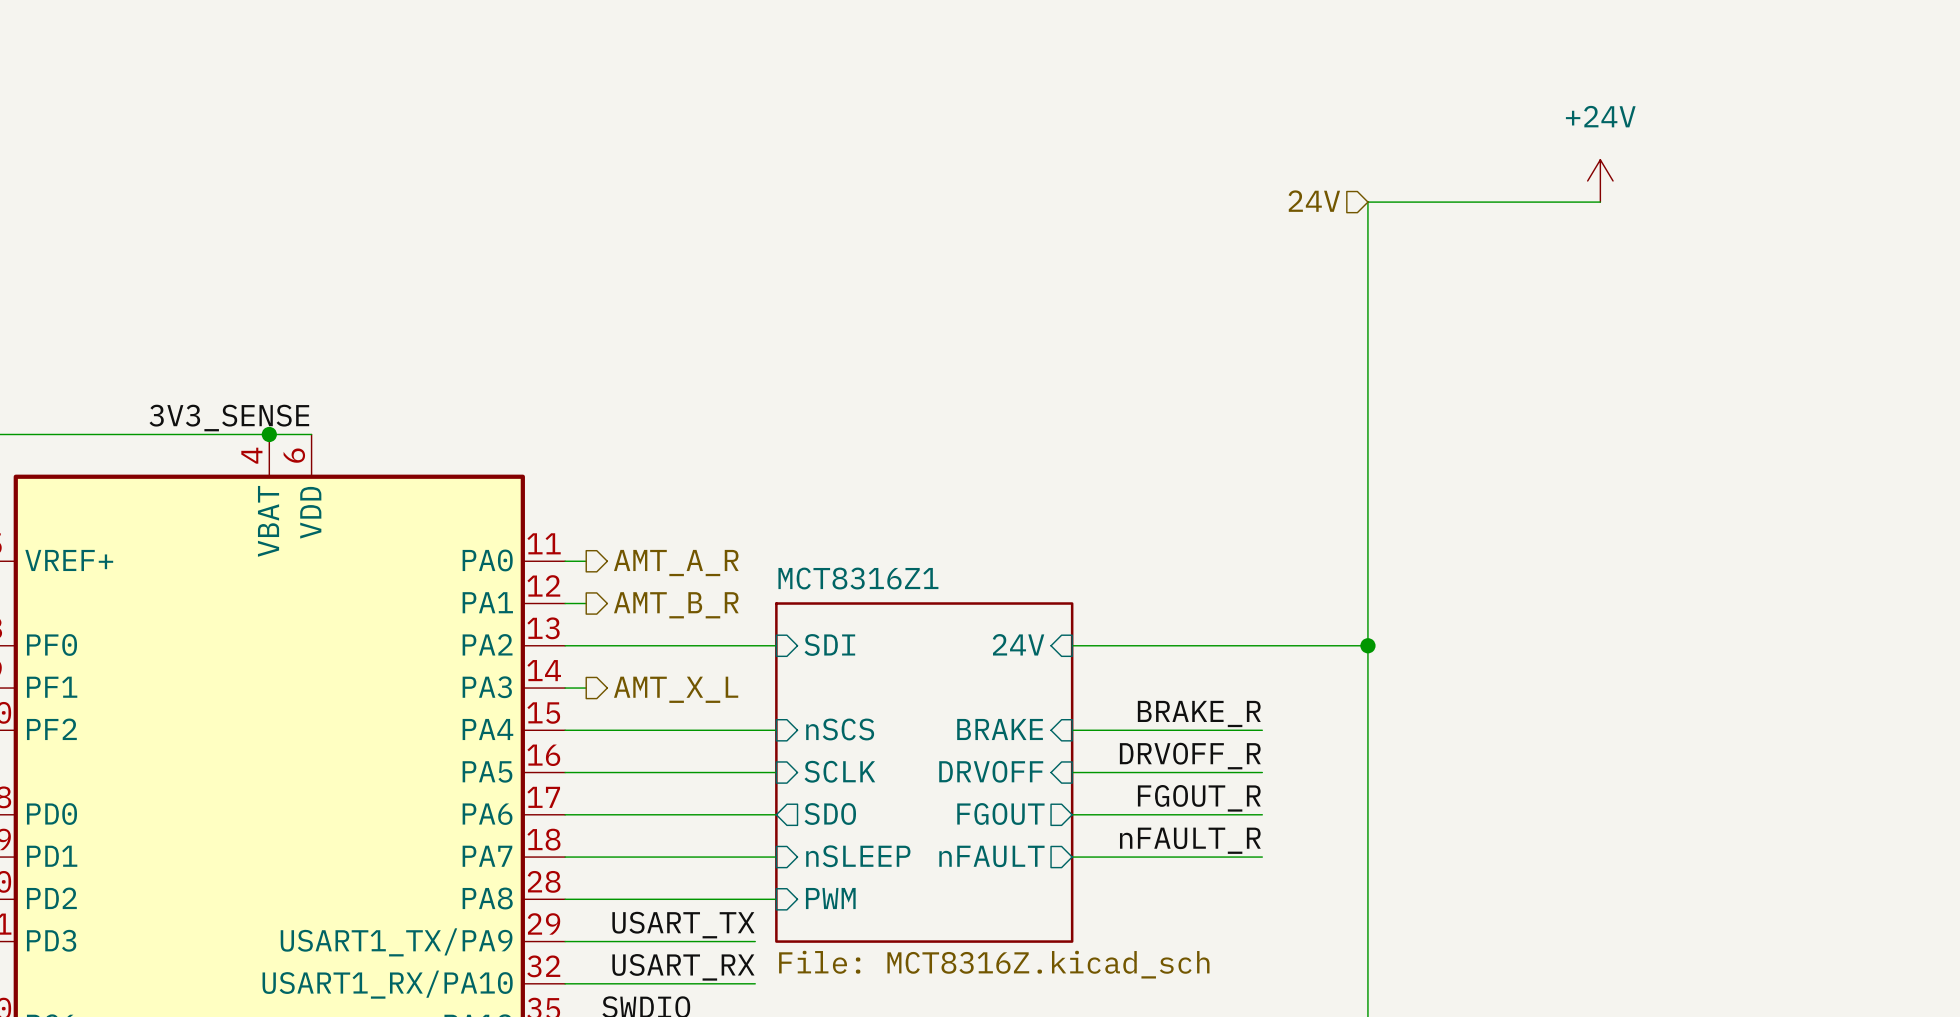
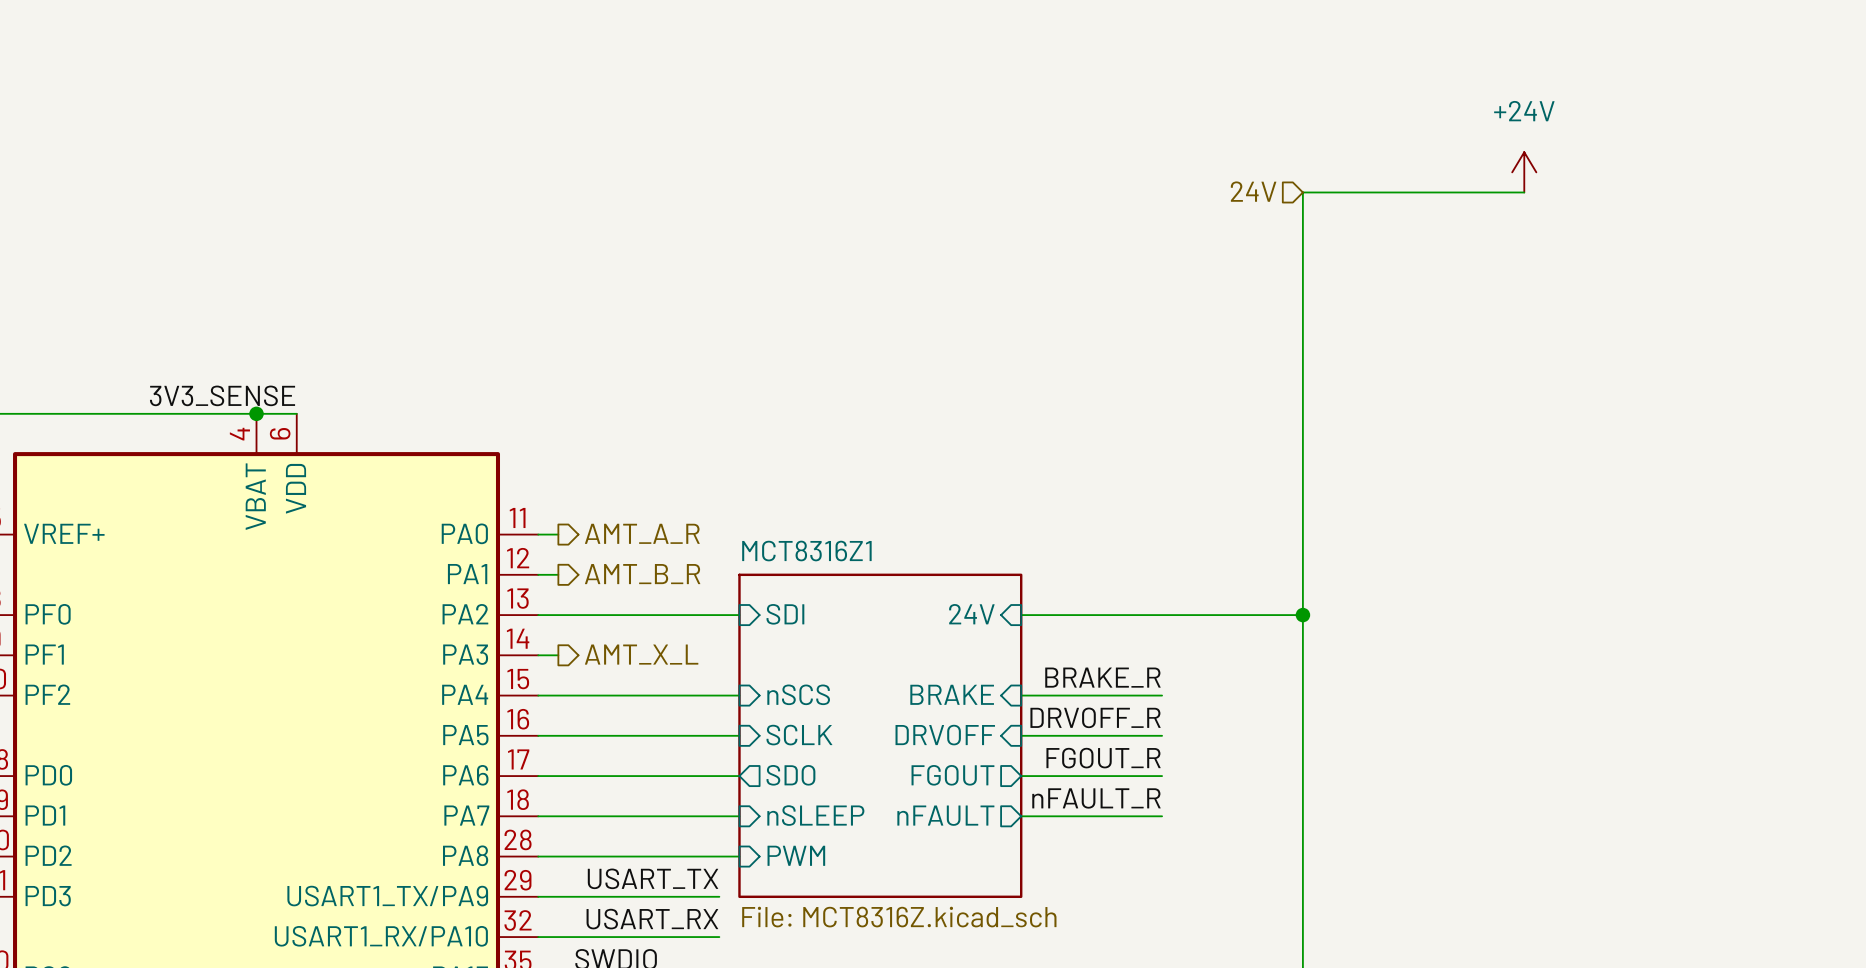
label position: BRAKE_R (1199, 713) -> BRAKE_R (1102, 677)
wire: (1220, 730) (1262, 730) -> none
label position: DRVOFF_R (1190, 756) -> DRVOFF_R (1095, 717)
wire: (1220, 772) (1262, 772) -> none
label position: FGOUT_R (1199, 798) -> FGOUT_R (1103, 758)
wire: (1220, 814) (1262, 814) -> none
label position: nFAULT_R (1190, 840) -> nFAULT_R (1096, 798)
wire: (1220, 857) (1262, 857) -> none

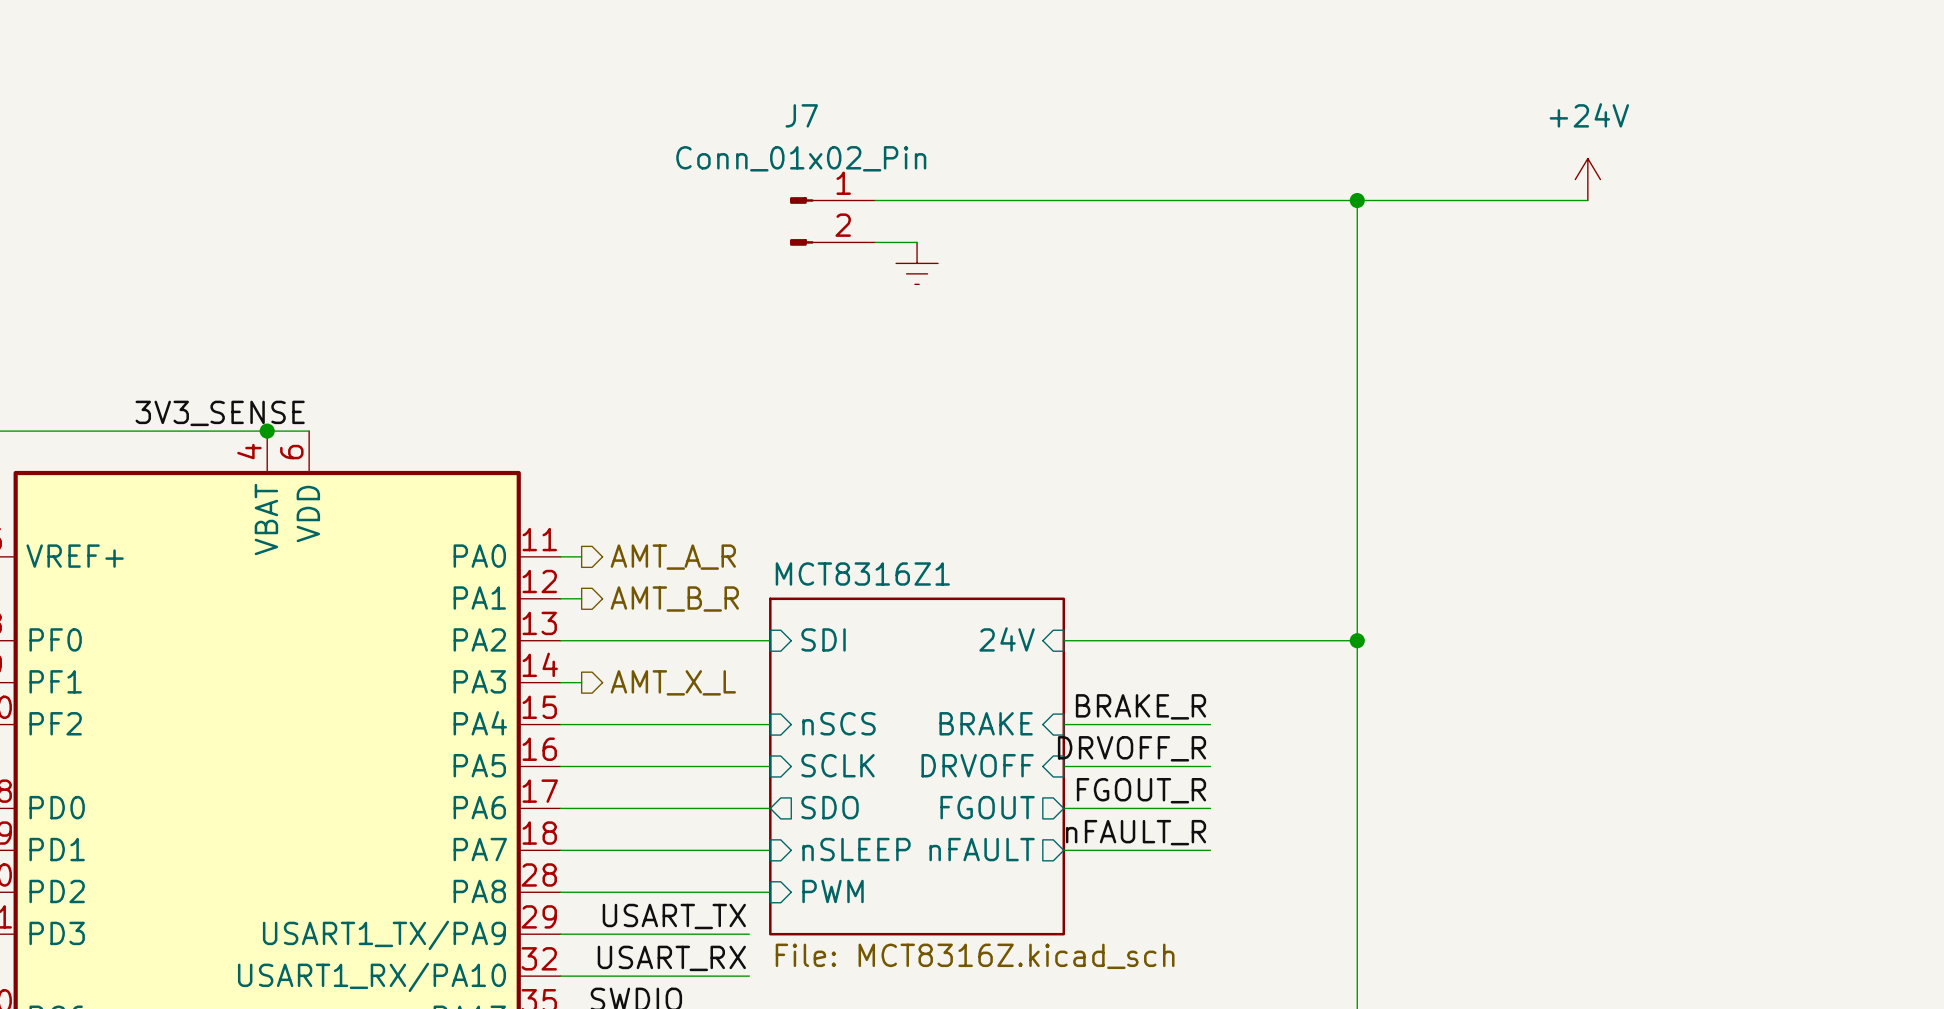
hierarchical label: 24V (1253, 191) -> none
wire: none -> (875, 200) (1357, 200)
junction: none -> (1357, 200)
J7: none -> Conn_01x02_Pin (832, 221)
wire: none -> (875, 242) (917, 242)
power symbol: none -> (917, 263)

